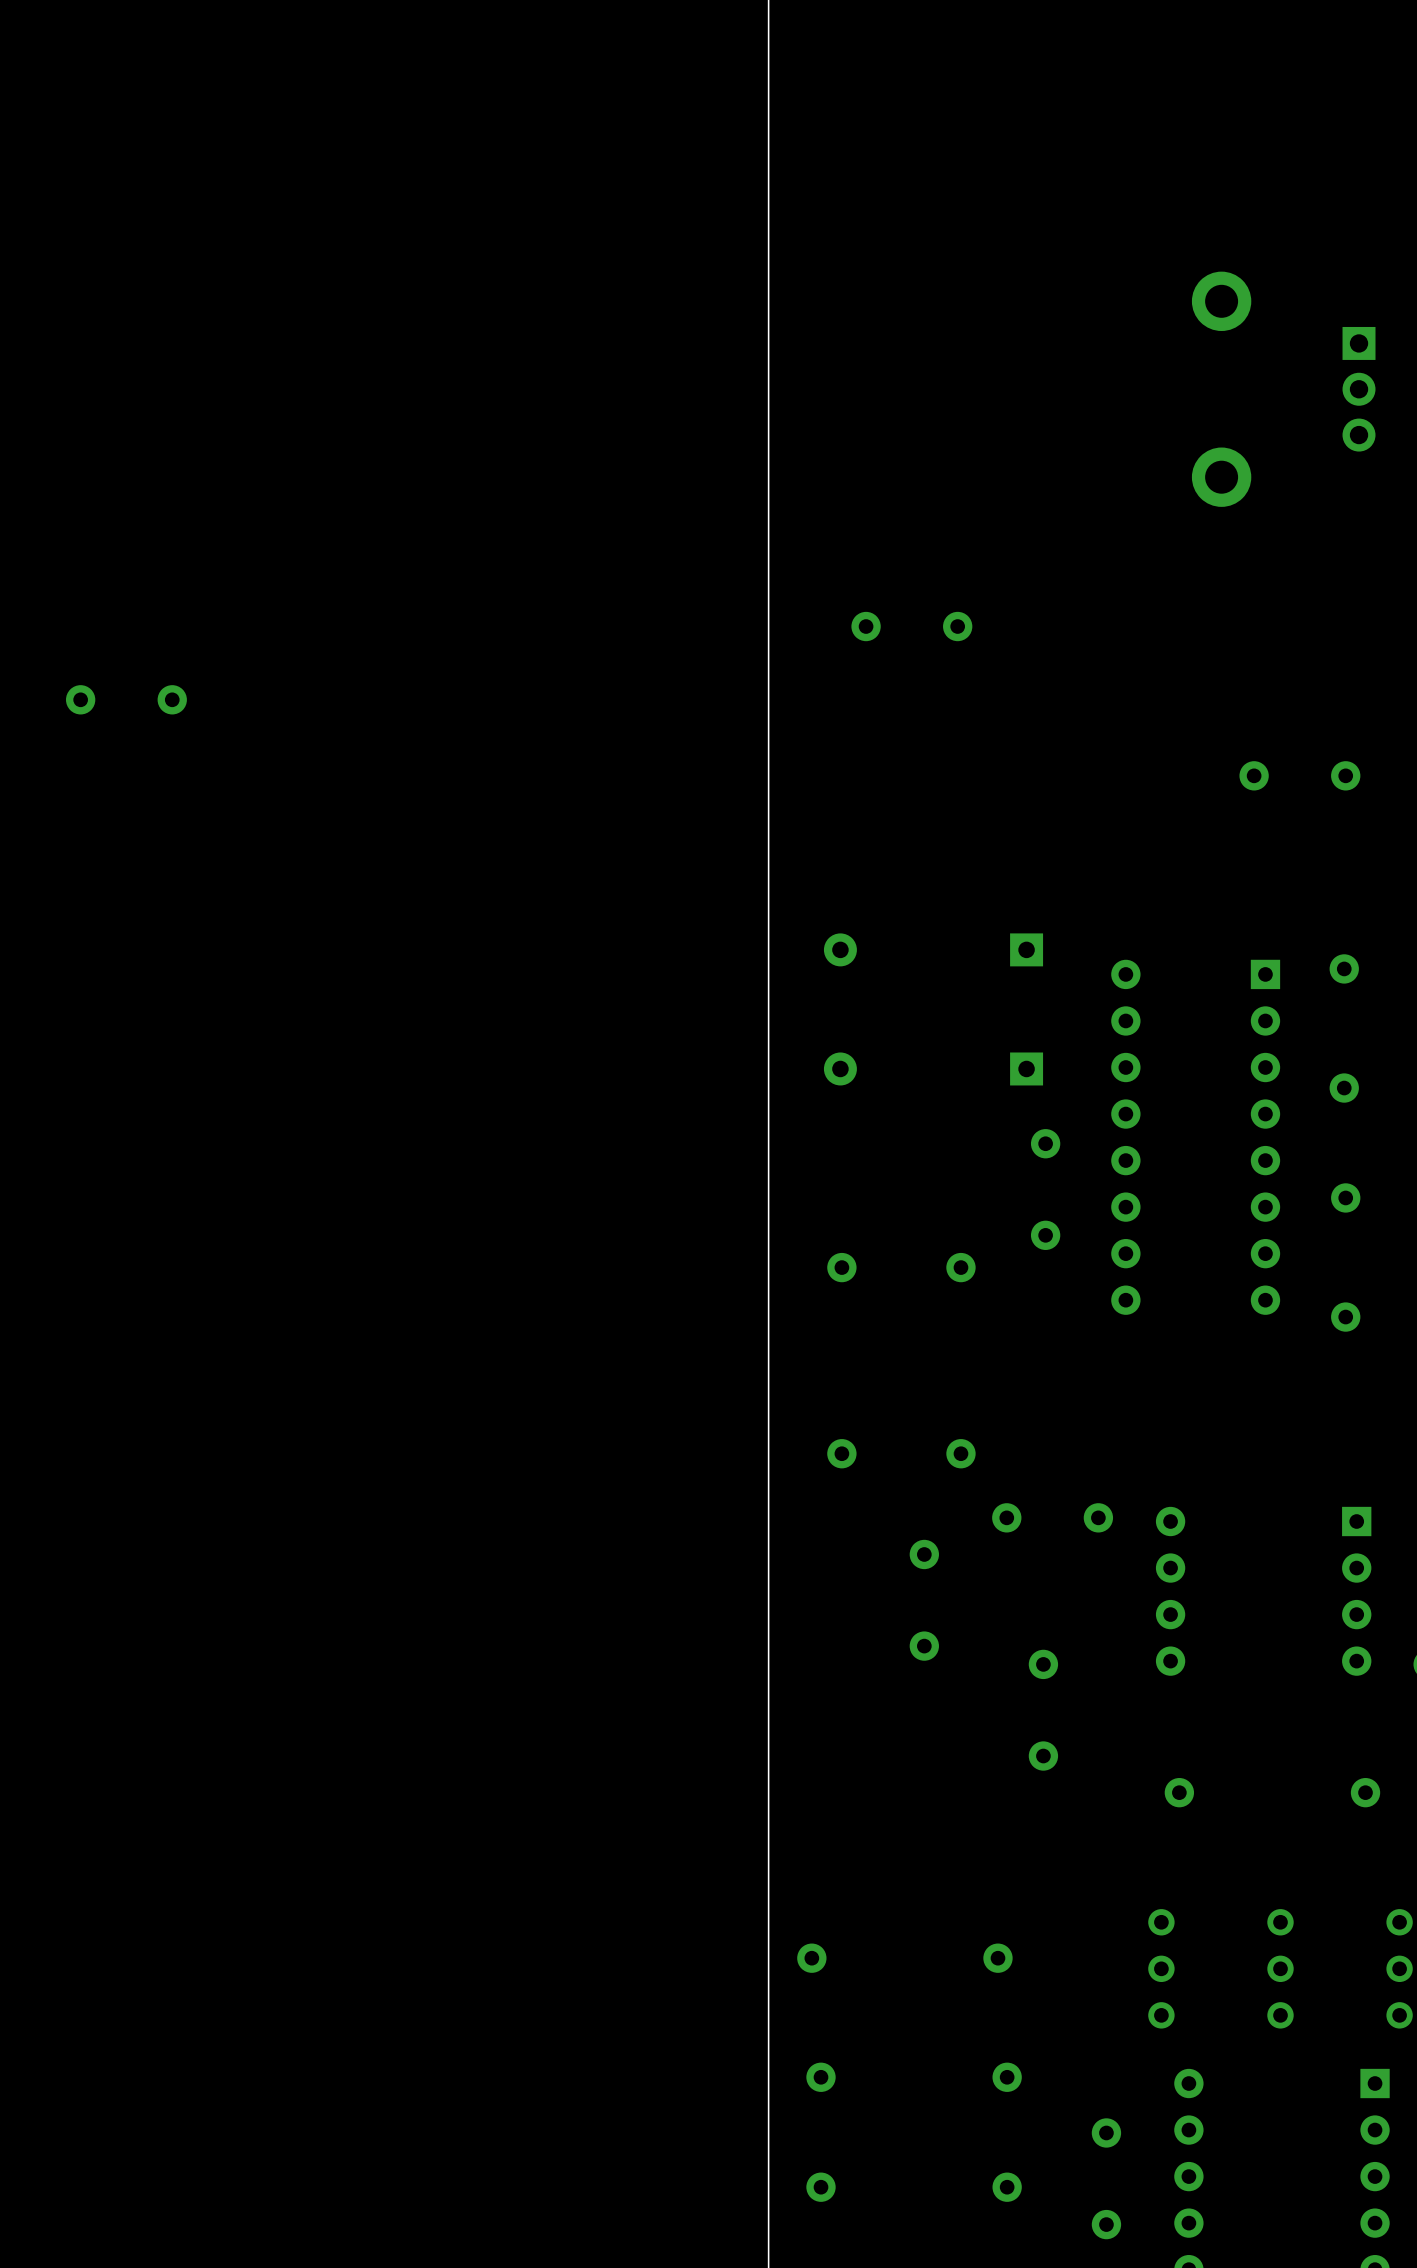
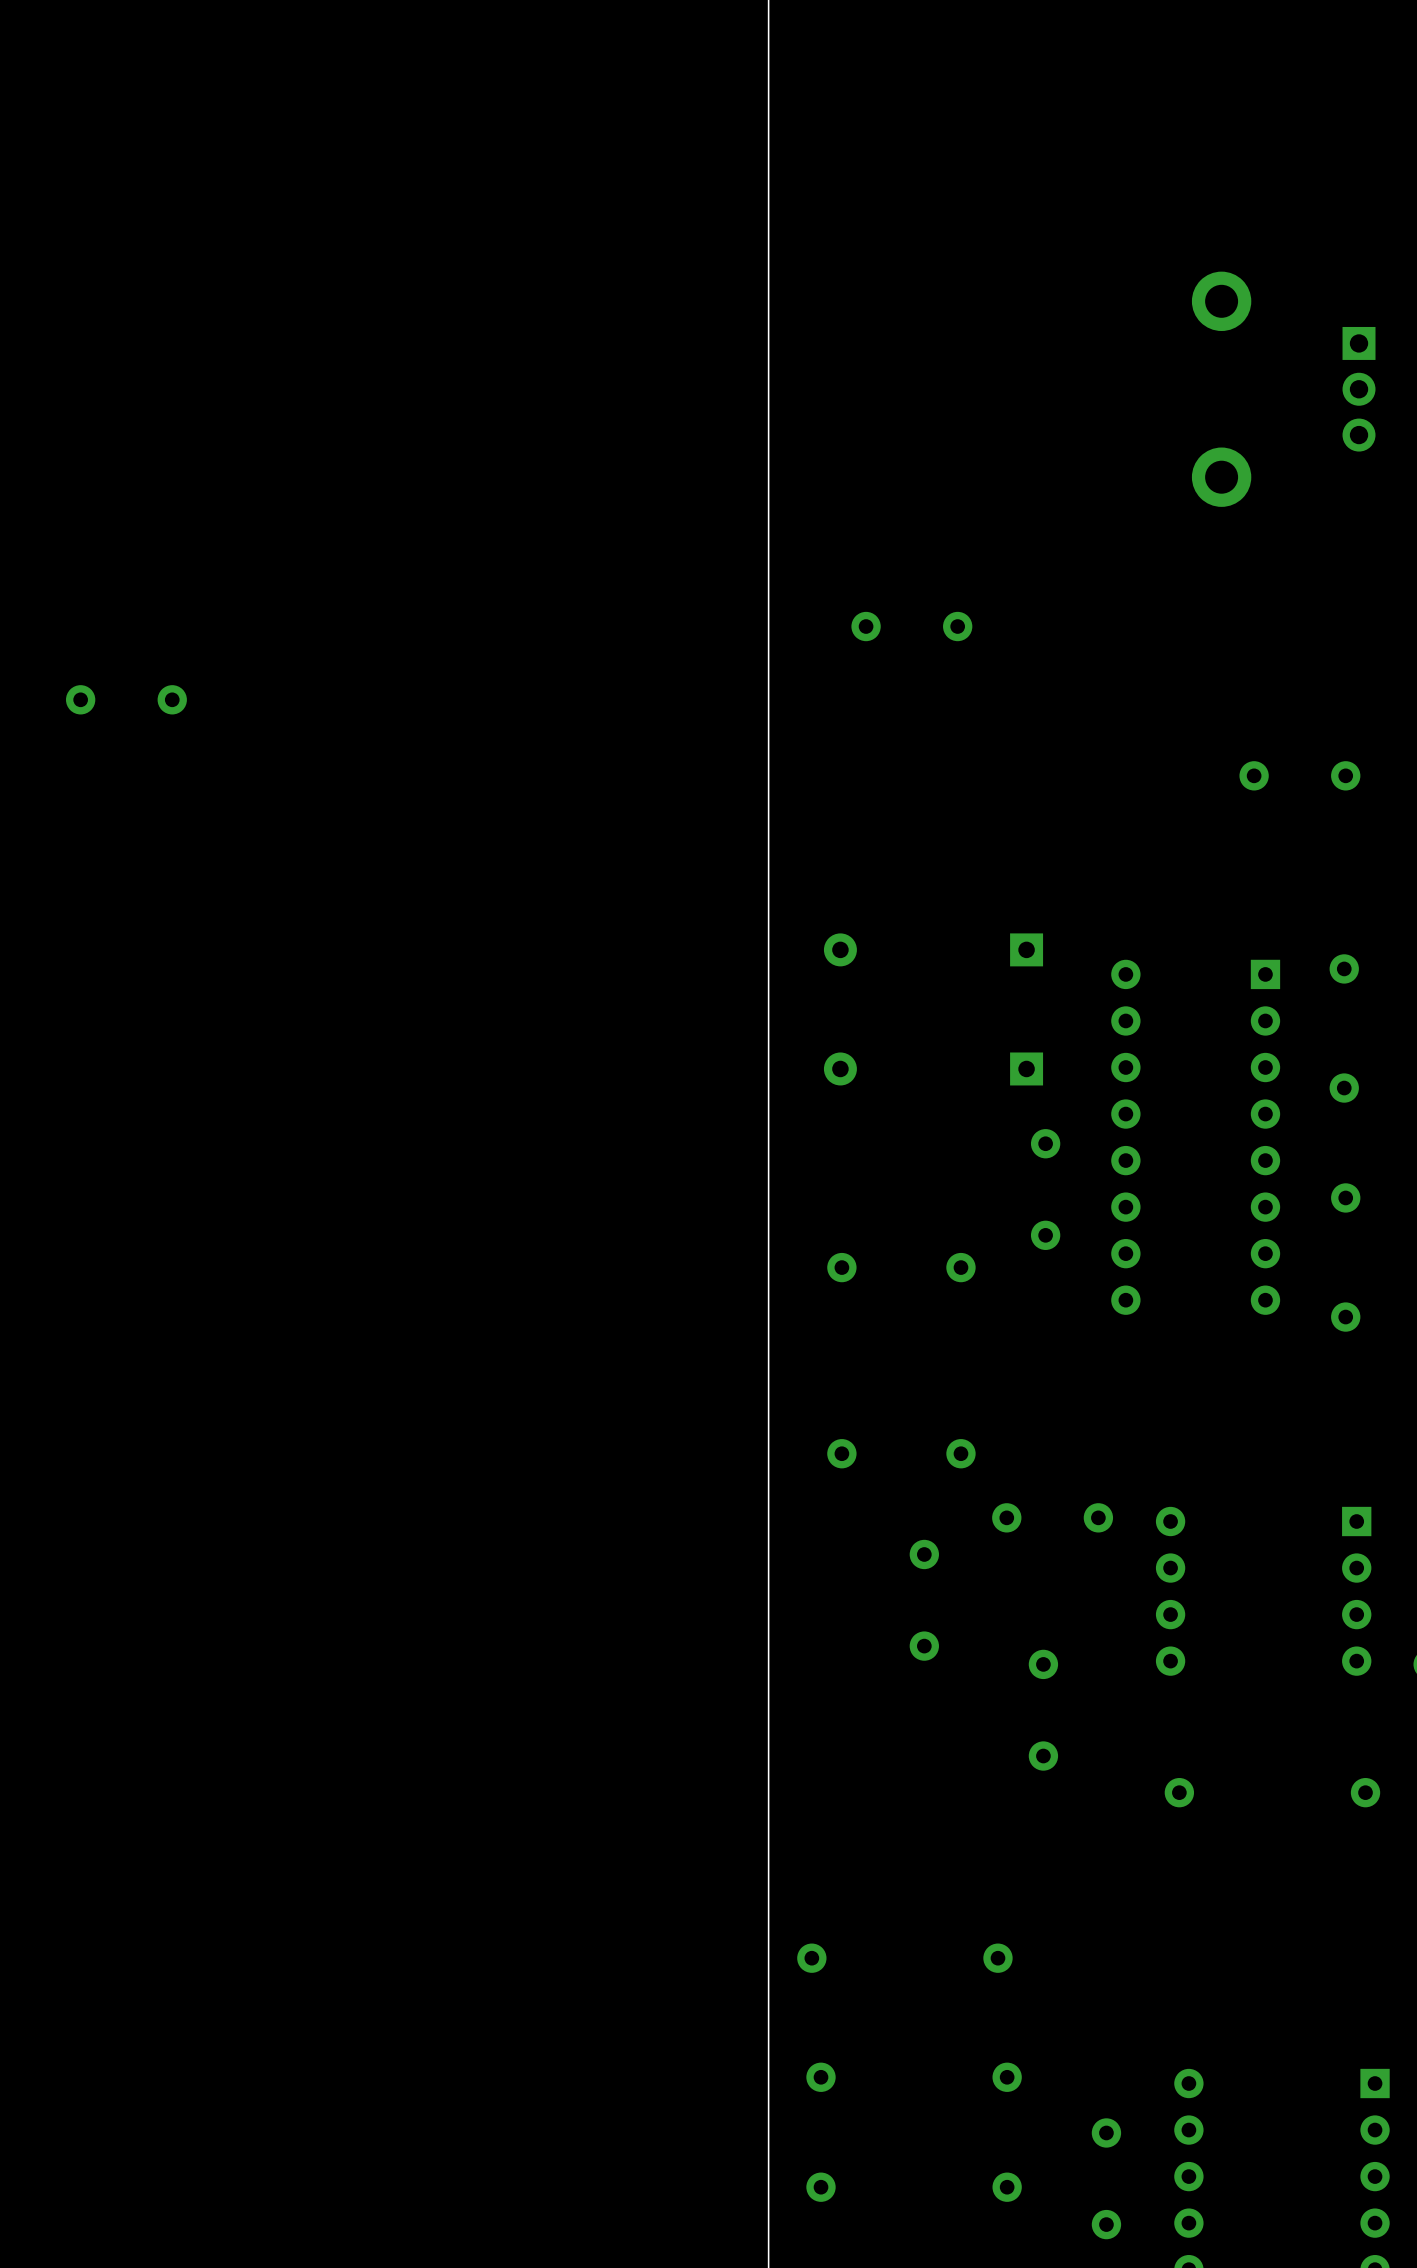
part: (1161, 1968) -> none
part: (1280, 1968) -> none
part: (1399, 1968) -> none

